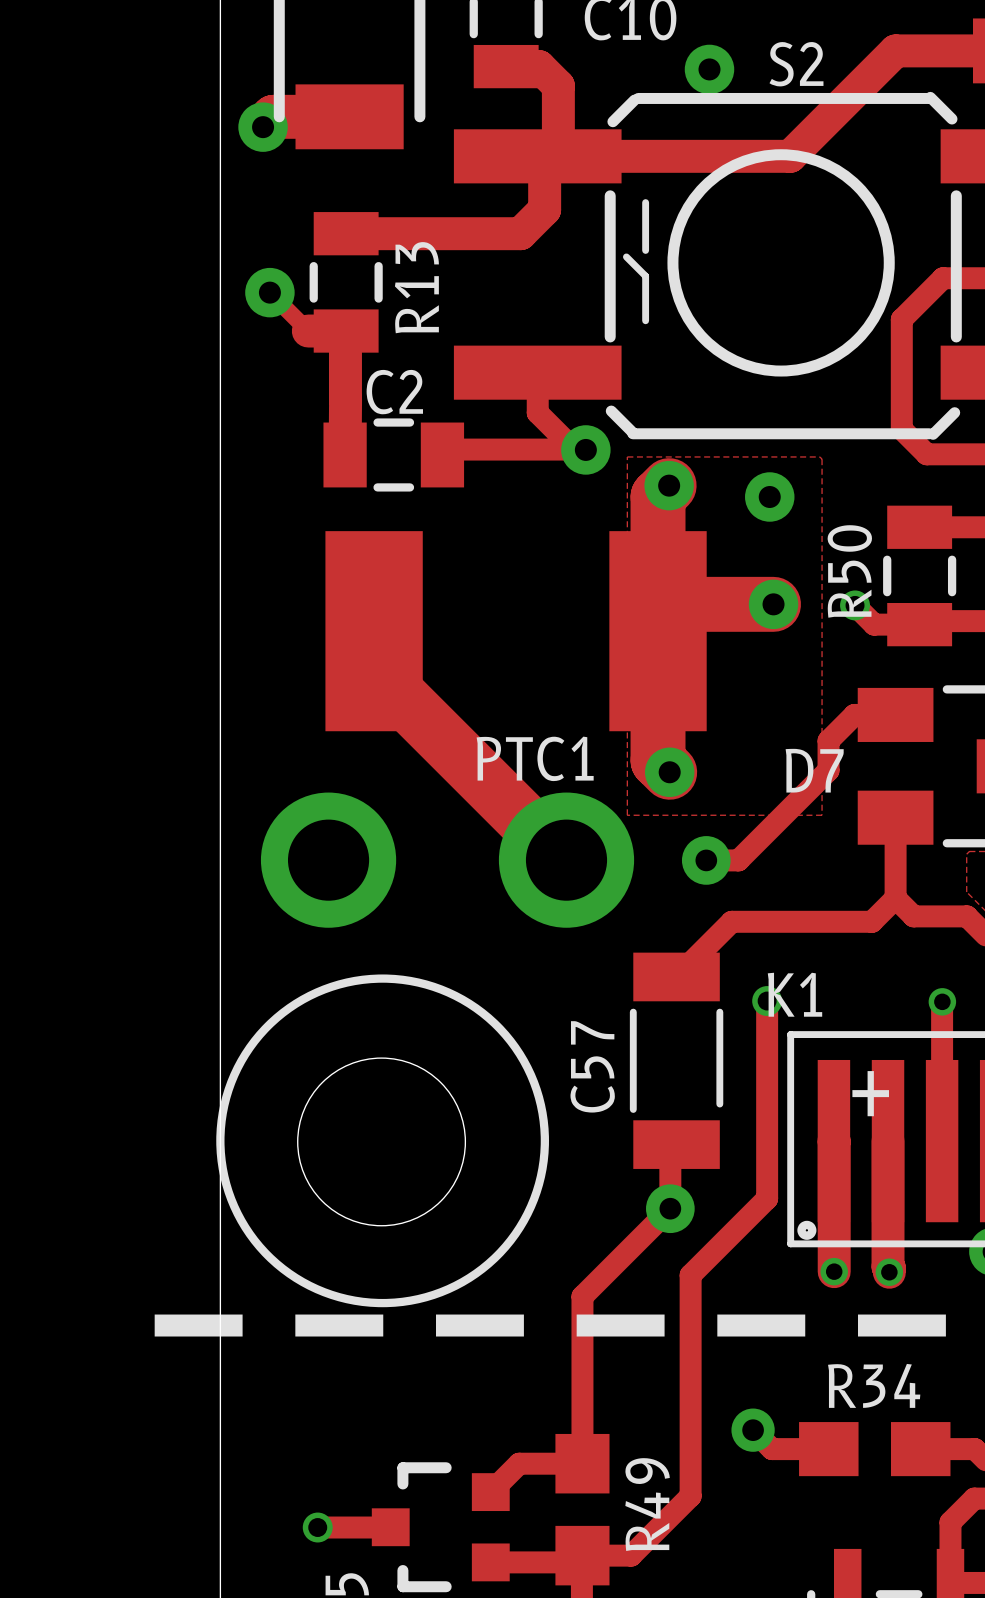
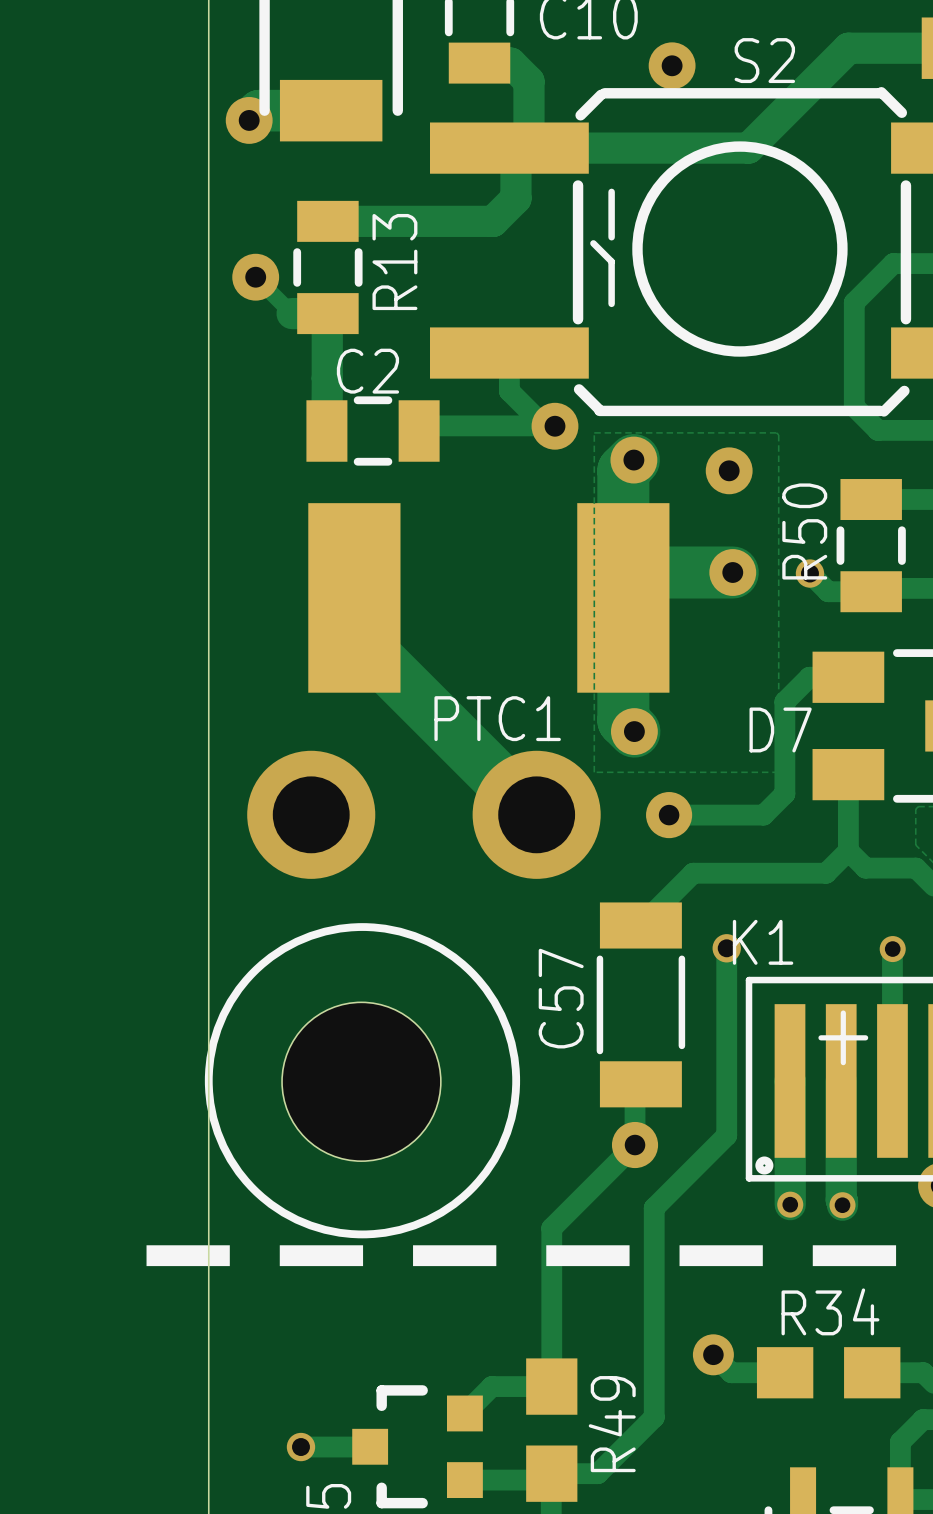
track: (828, 770) (738, 860) -> (784, 729) (784, 793) (763, 815) (699, 815)

